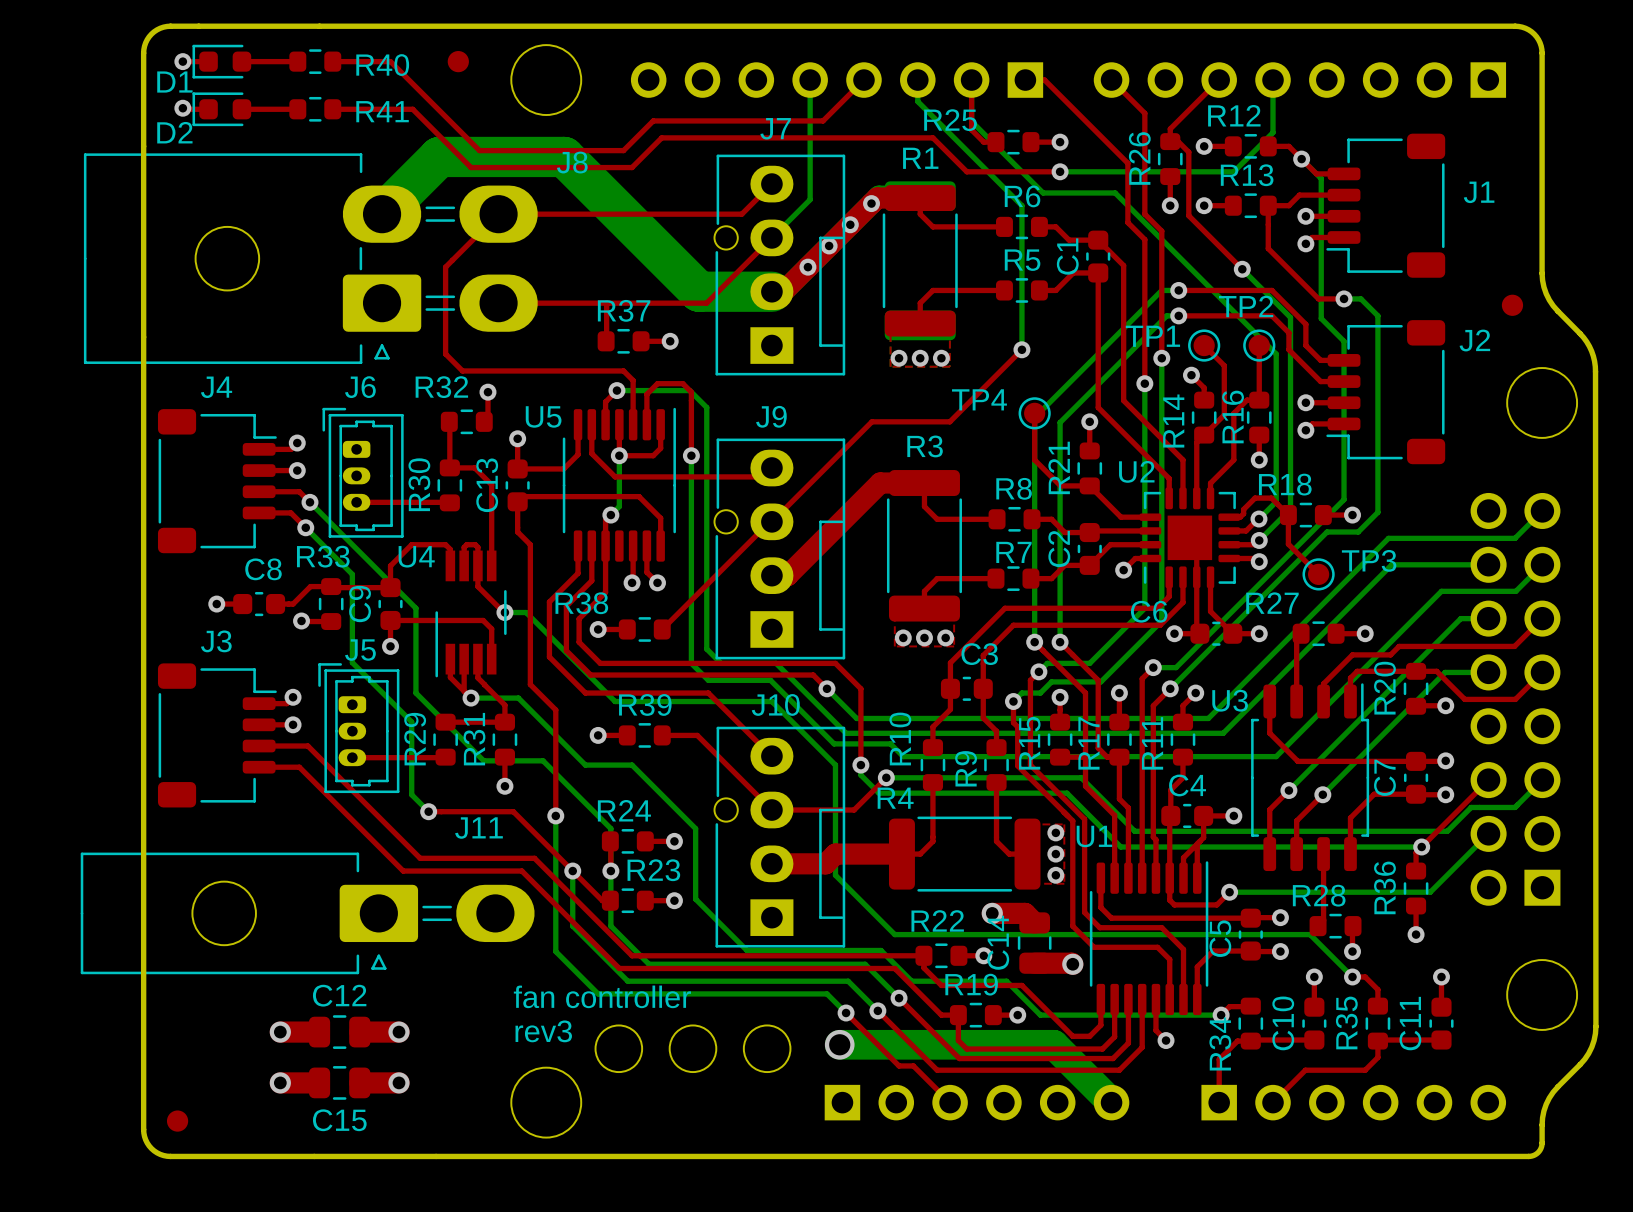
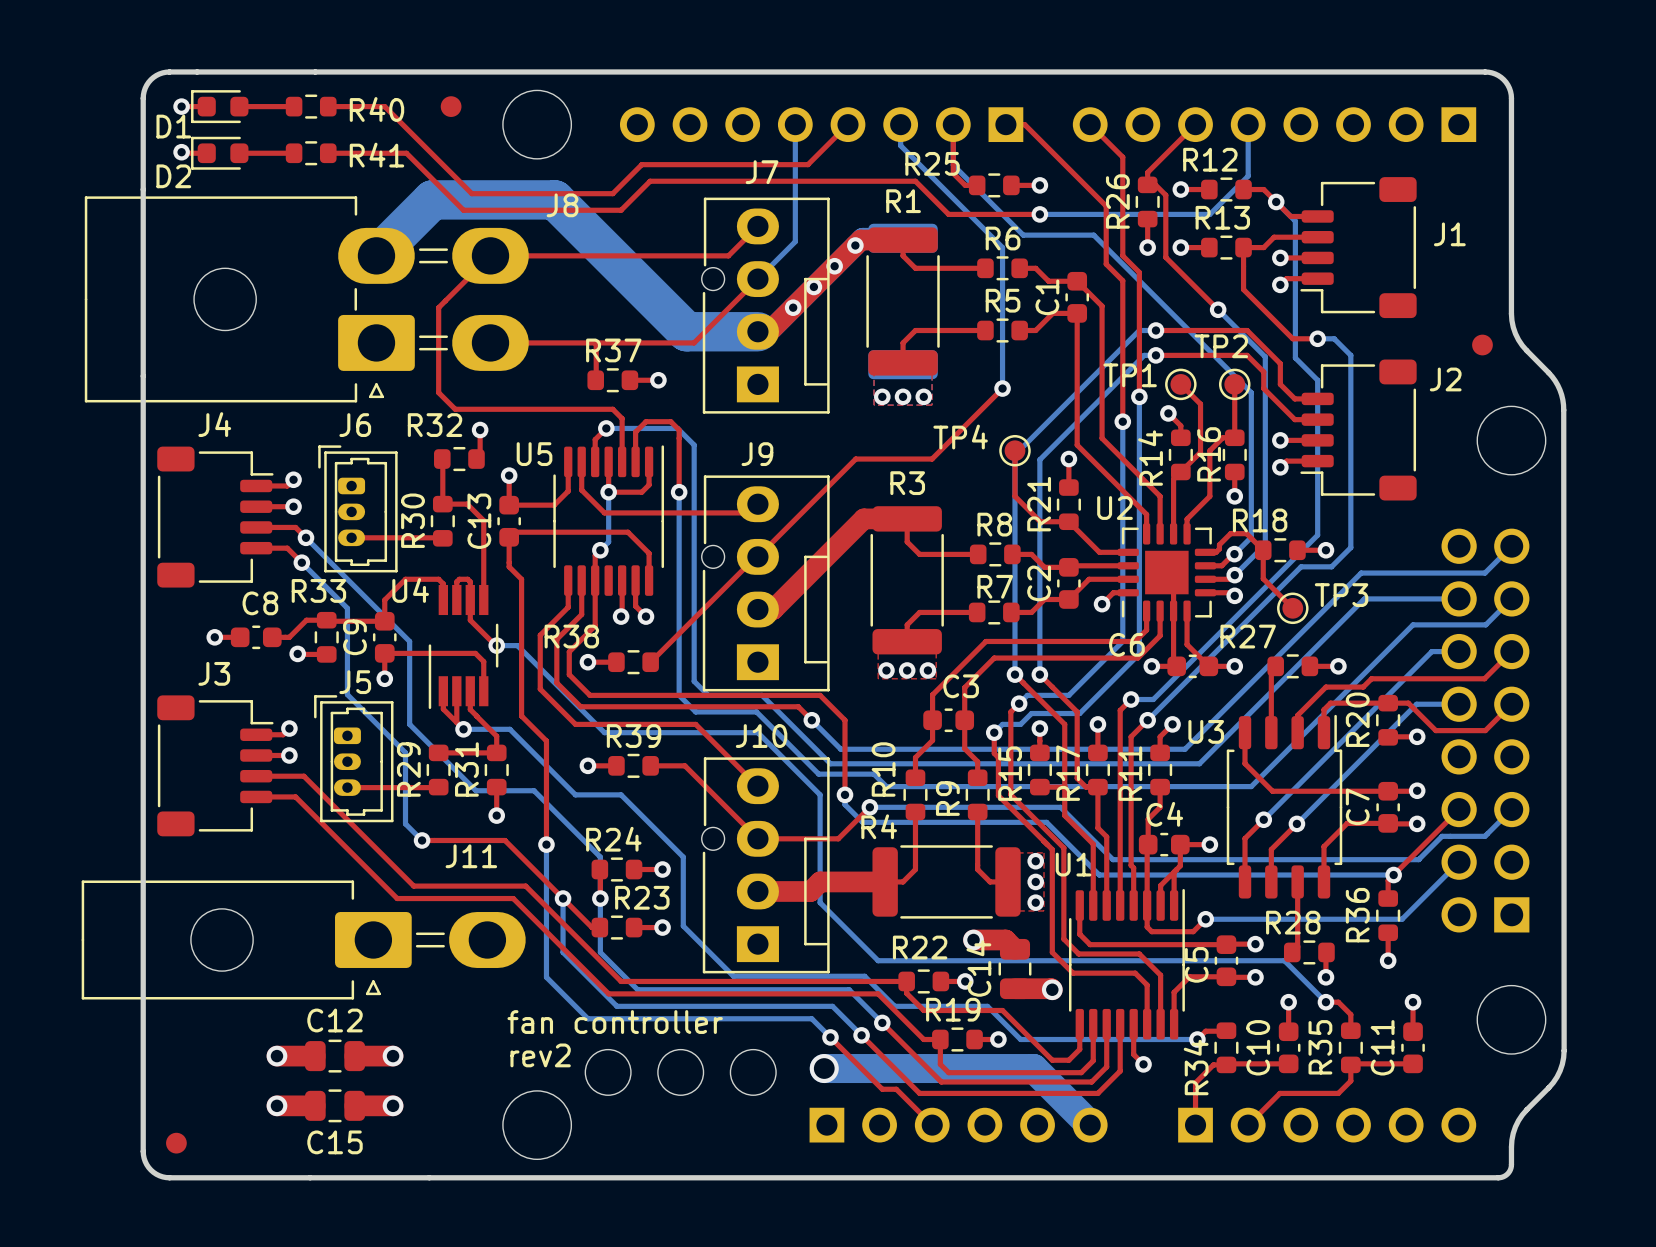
text: rev3 (543, 1031) -> rev2 (540, 1055)

